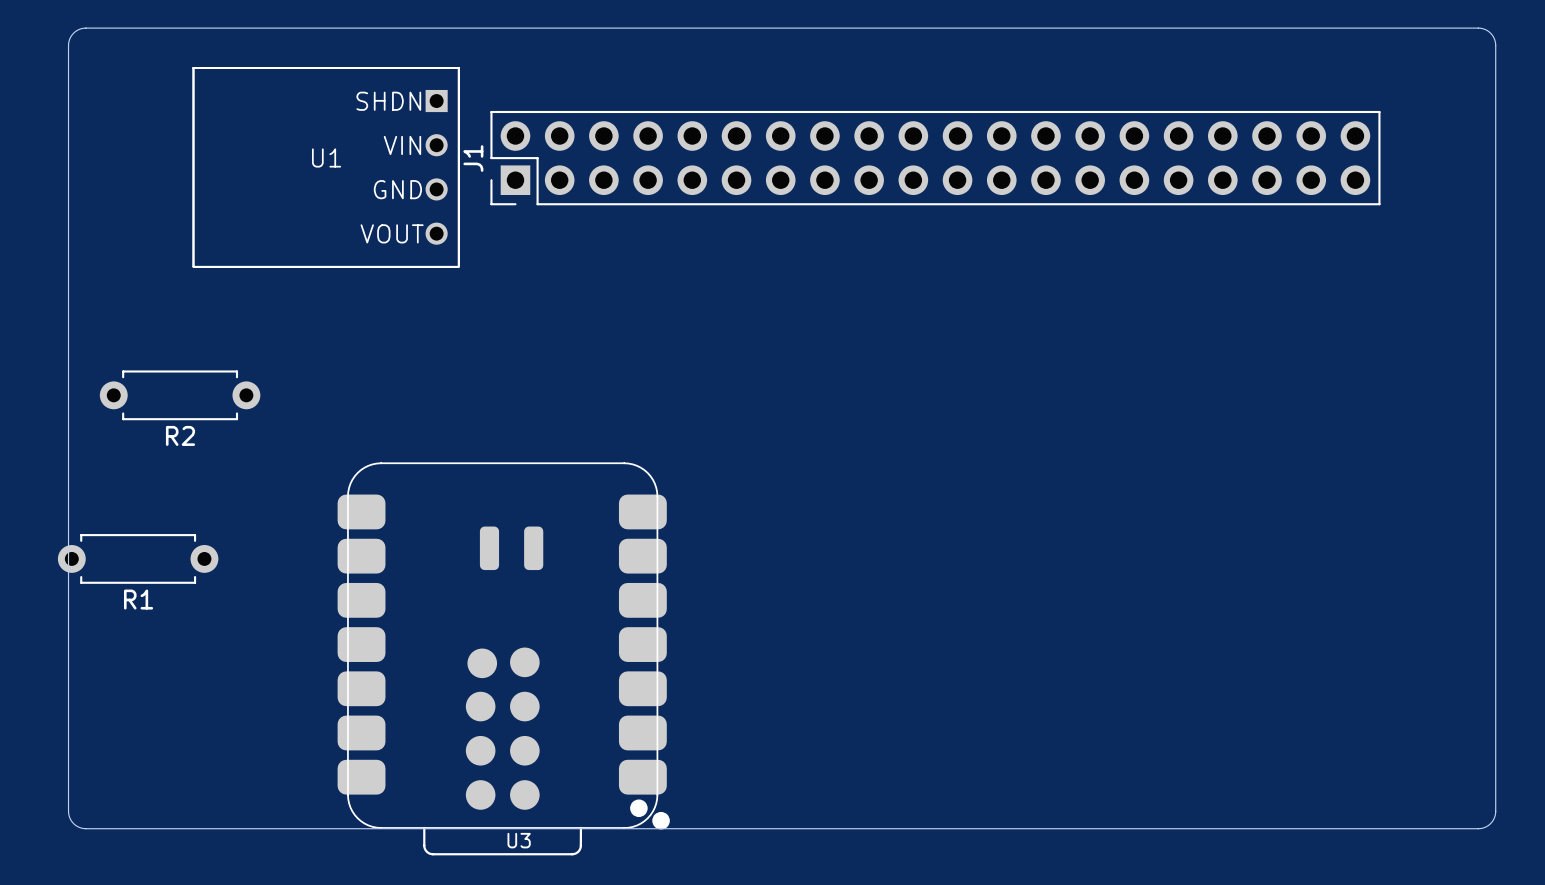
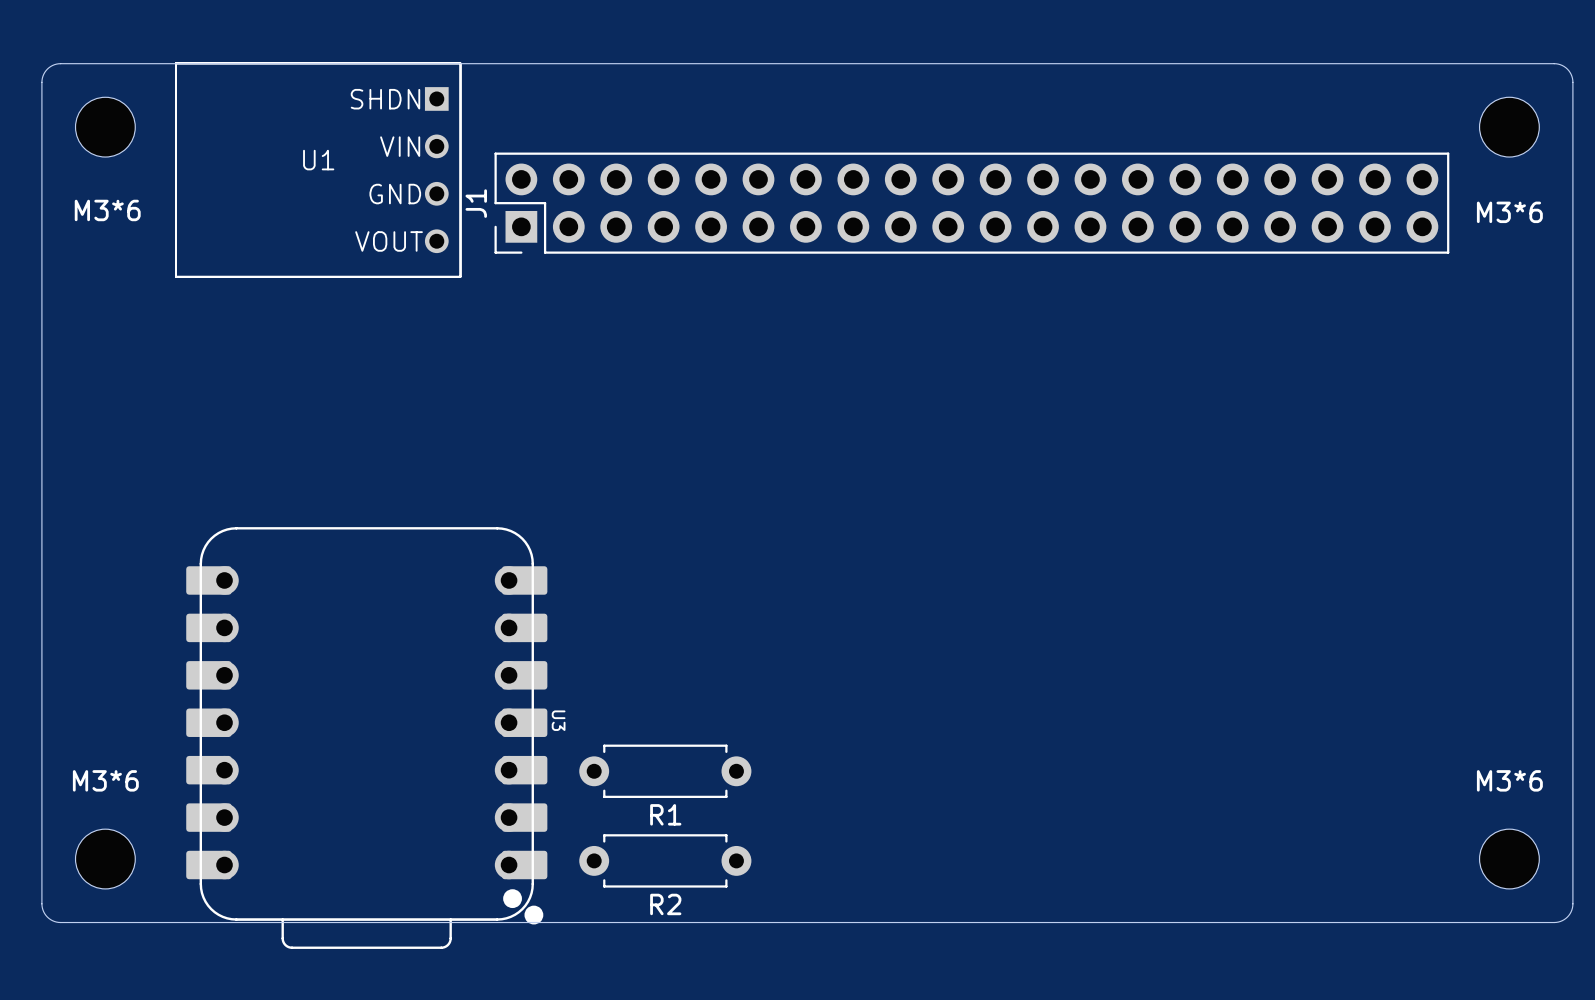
M3*6: none -> (105, 127)
M3*6: none -> (1509, 127)
U1 position: (326, 167) -> (318, 170)
R2 position: (180, 395) -> (665, 860)
U3 footprint: [337, 462, 670, 856] -> [186, 527, 548, 949]
R1 position: (138, 558) -> (665, 771)
M3*6: none -> (105, 859)
M3*6: none -> (1509, 859)
U3 name position: U3 (519, 840) -> U3 (558, 720)

